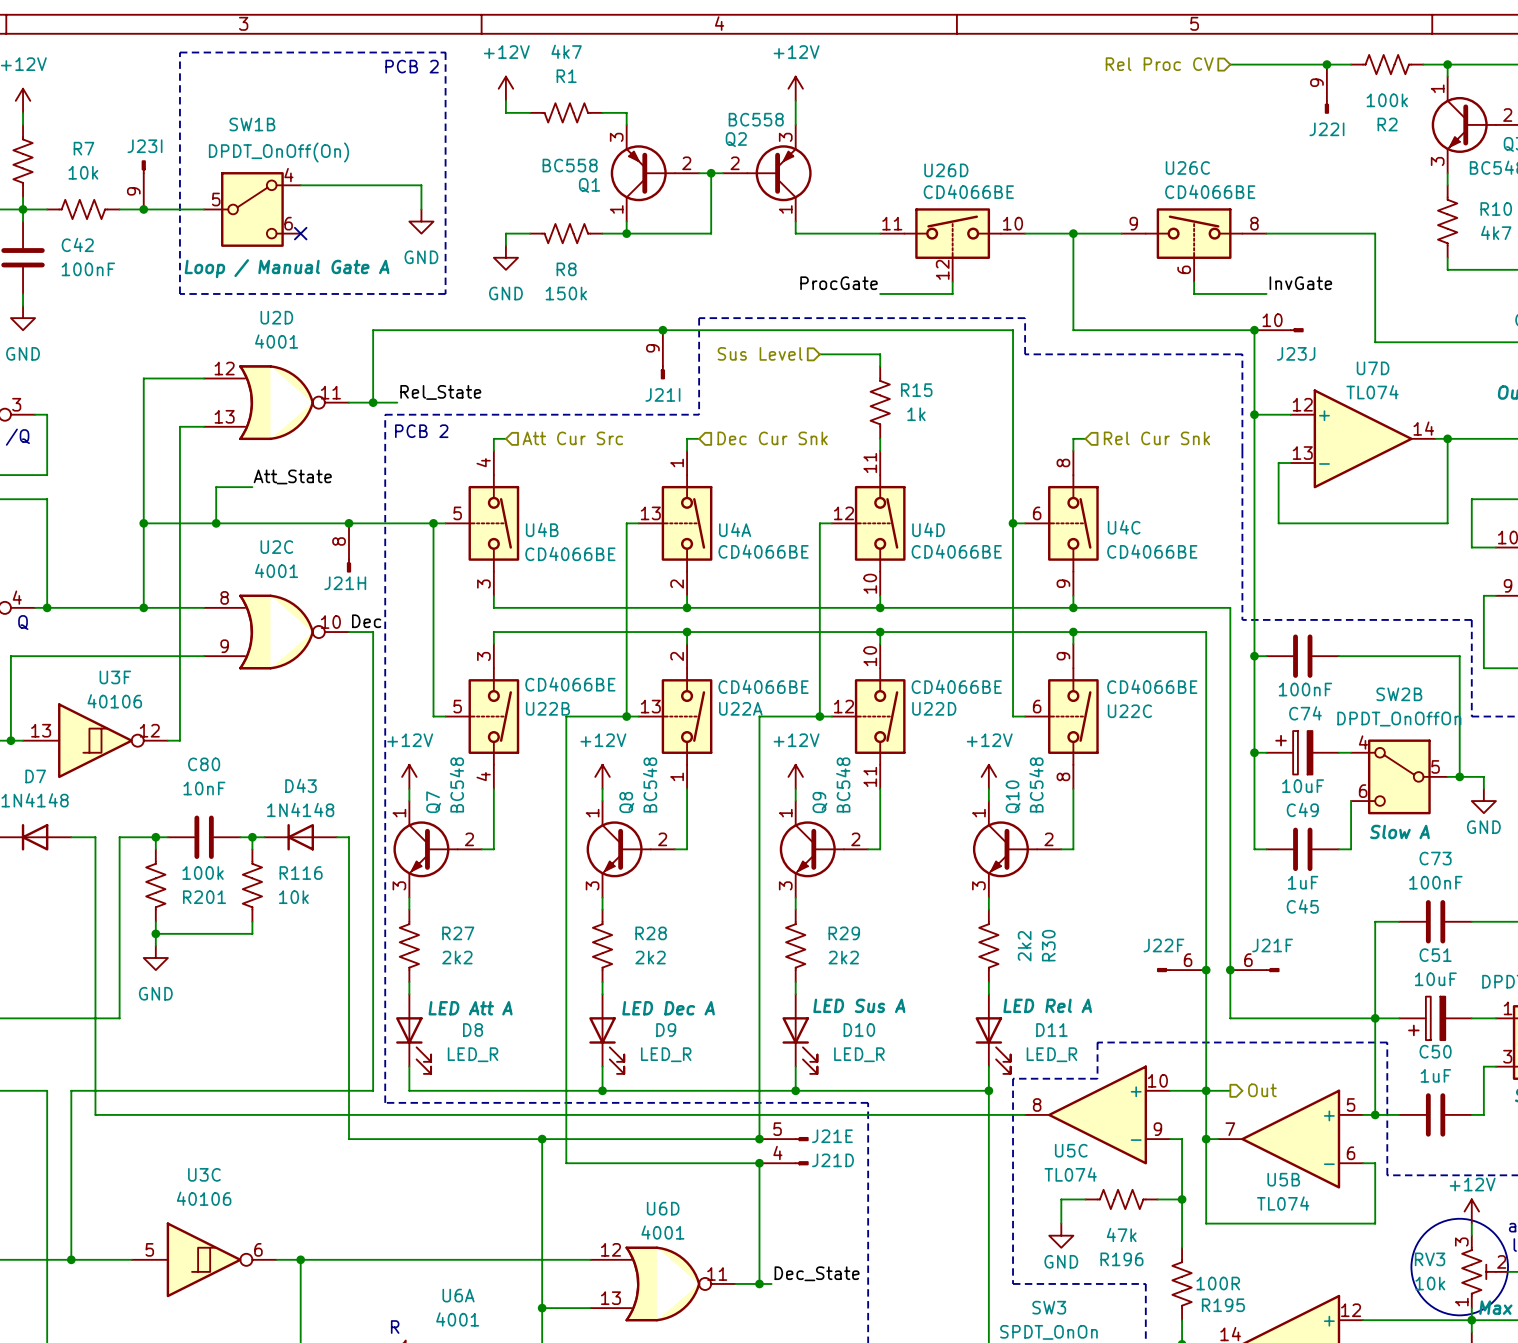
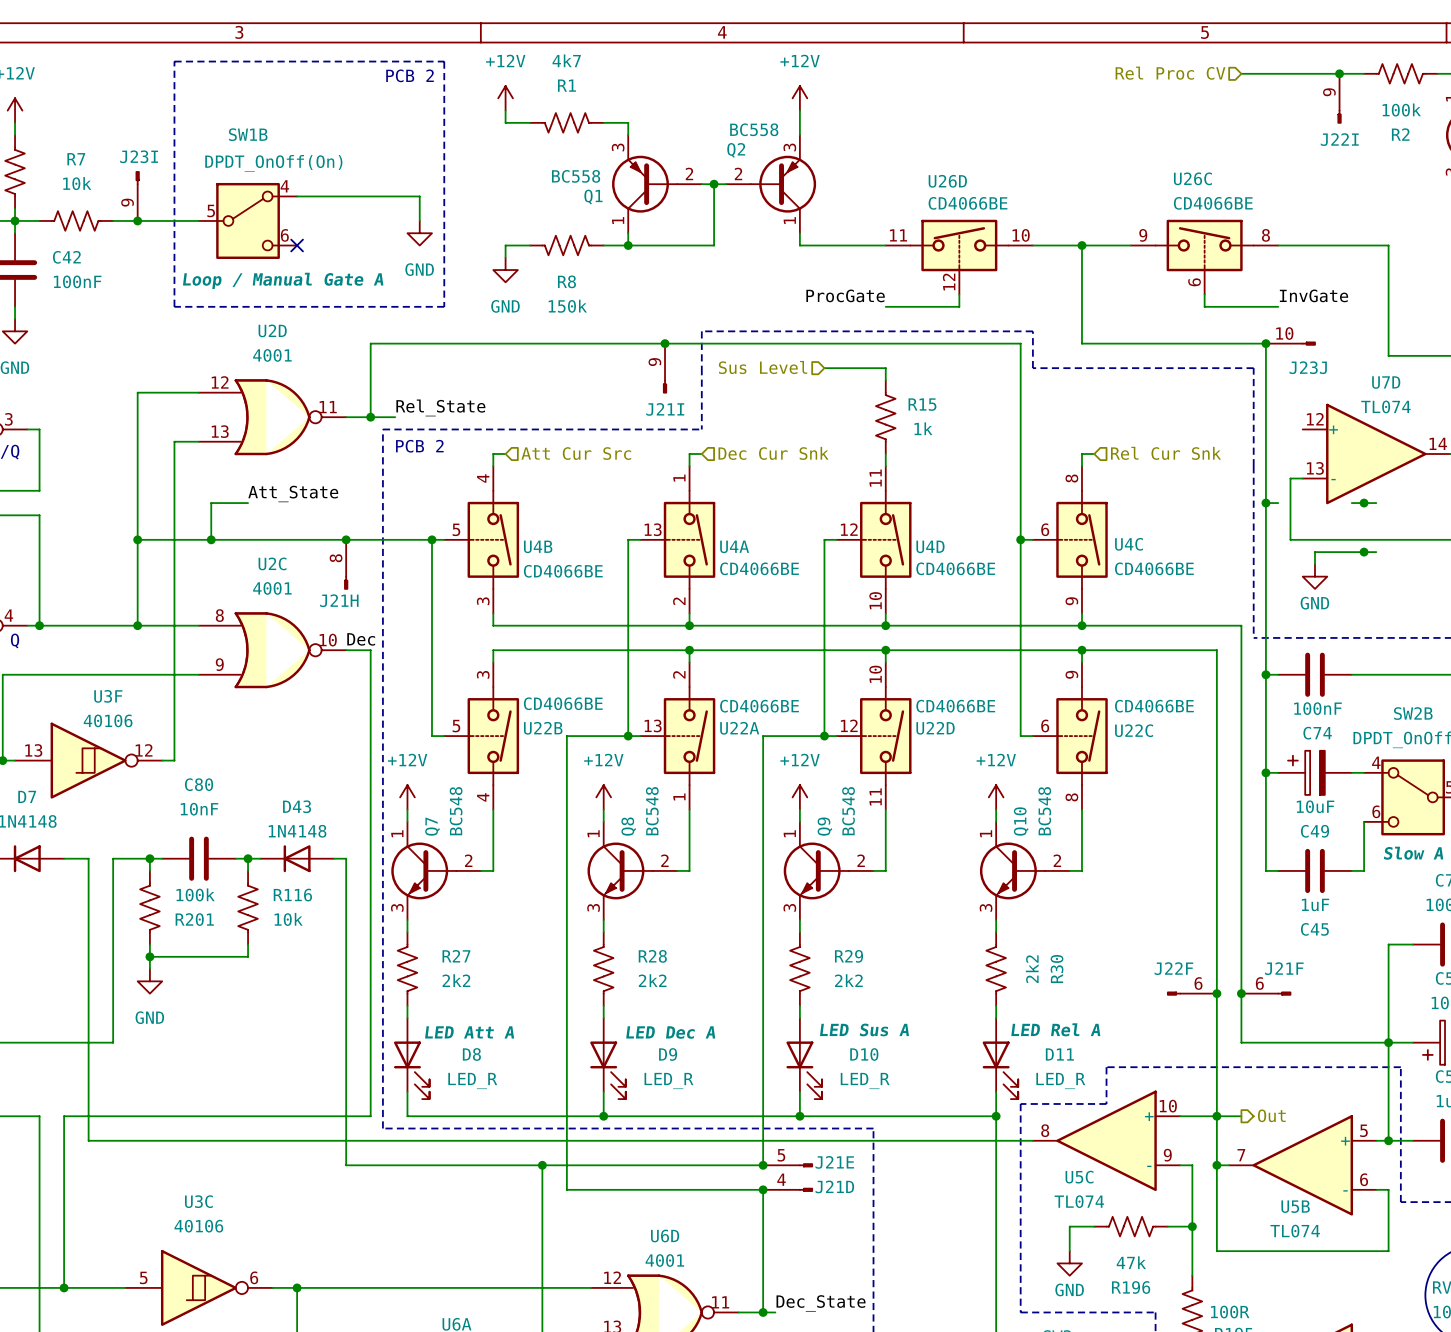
wire: (1254, 414) (1290, 414) -> none
junction: (1254, 414) -> none
wire: none -> (1265, 503) (1278, 503)
junction: none -> (1265, 503)
wire: none -> (1351, 503) (1376, 503)
junction: none -> (1364, 503)
junction: none -> (1364, 552)
wire: none -> (1376, 552) (1315, 552) (1315, 564)
power symbol: none -> GND (1315, 576)

